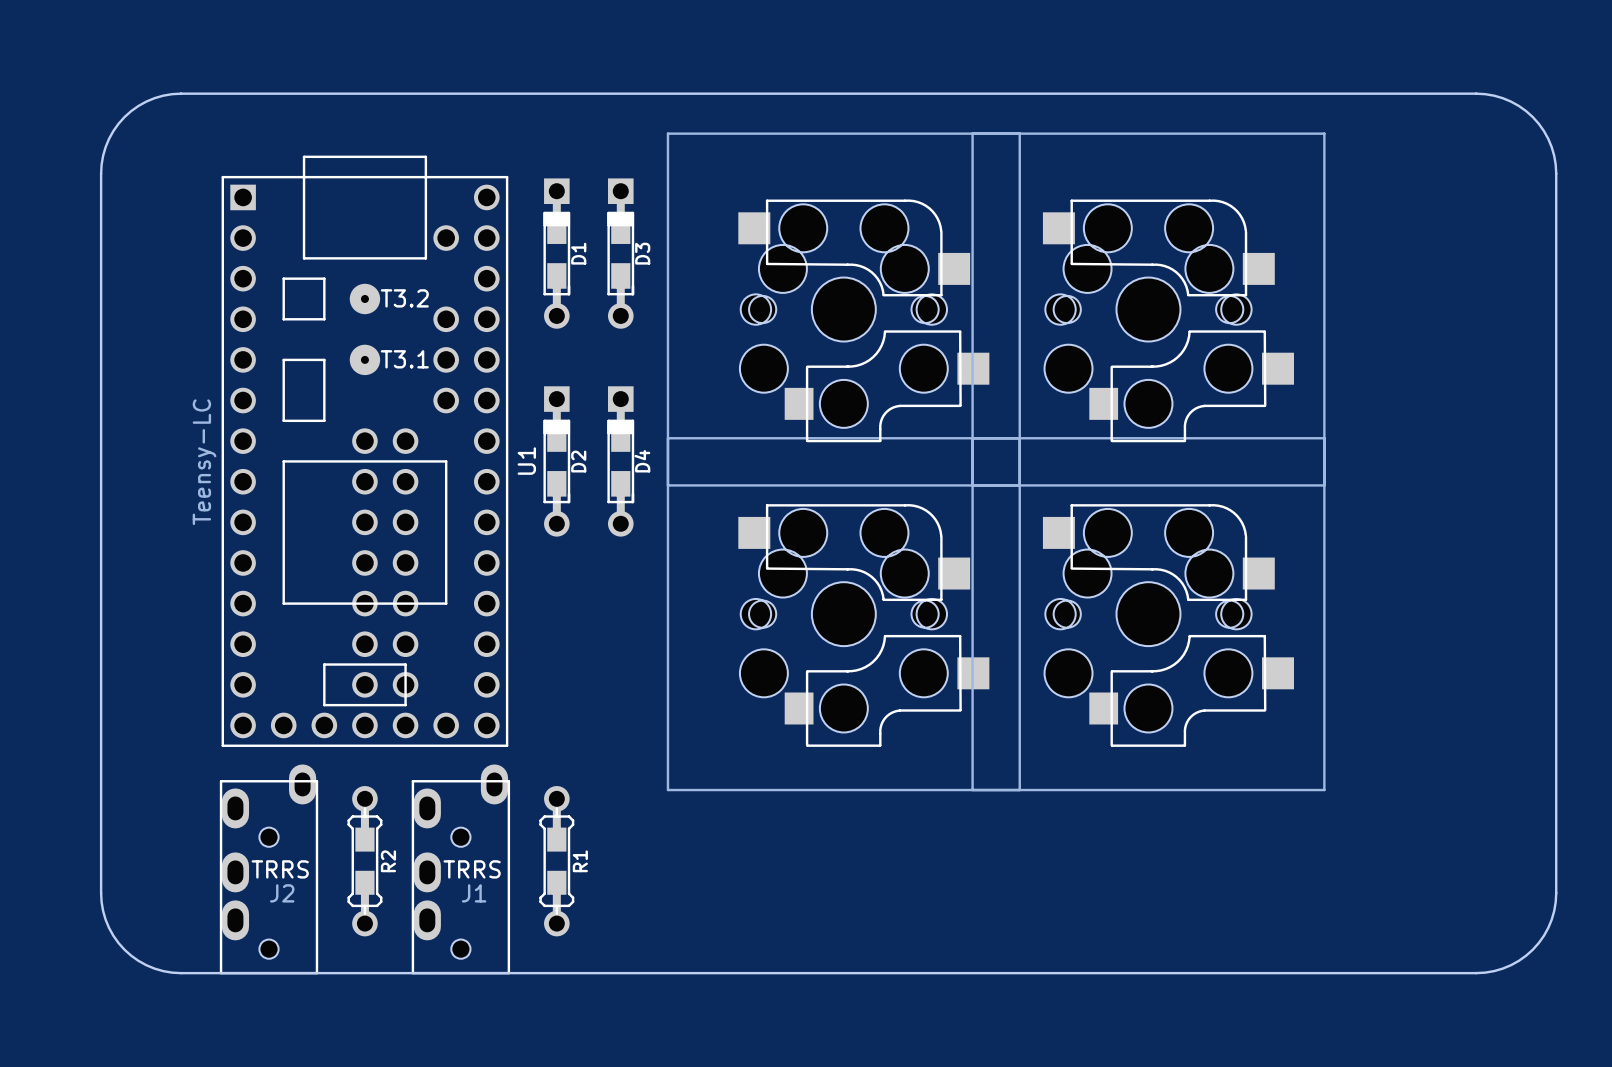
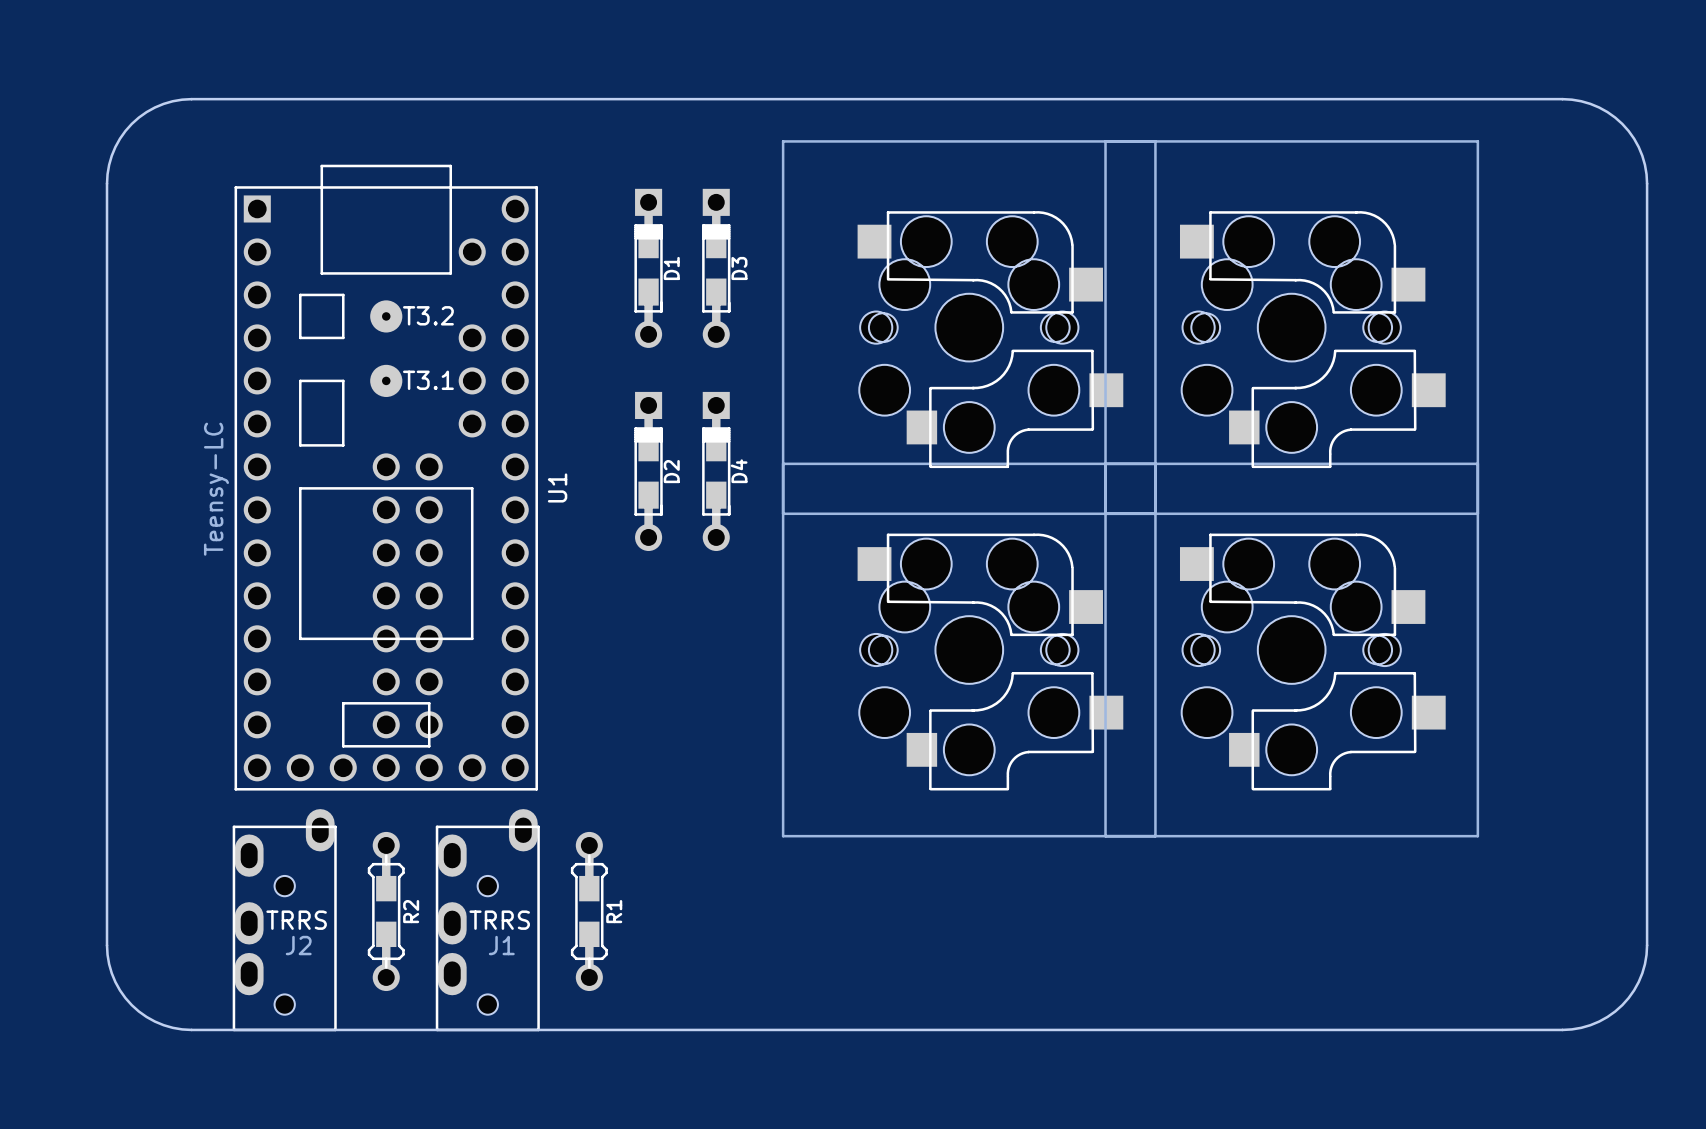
D1 position: (556, 253) -> (648, 268)
D3 position: (620, 253) -> (716, 268)
part position: (843, 309) -> (969, 327)
part position: (1148, 309) -> (1291, 327)
D2 position: (556, 461) -> (648, 471)
D4 position: (620, 461) -> (716, 471)
part position: (843, 614) -> (969, 650)
part position: (1148, 614) -> (1291, 650)

